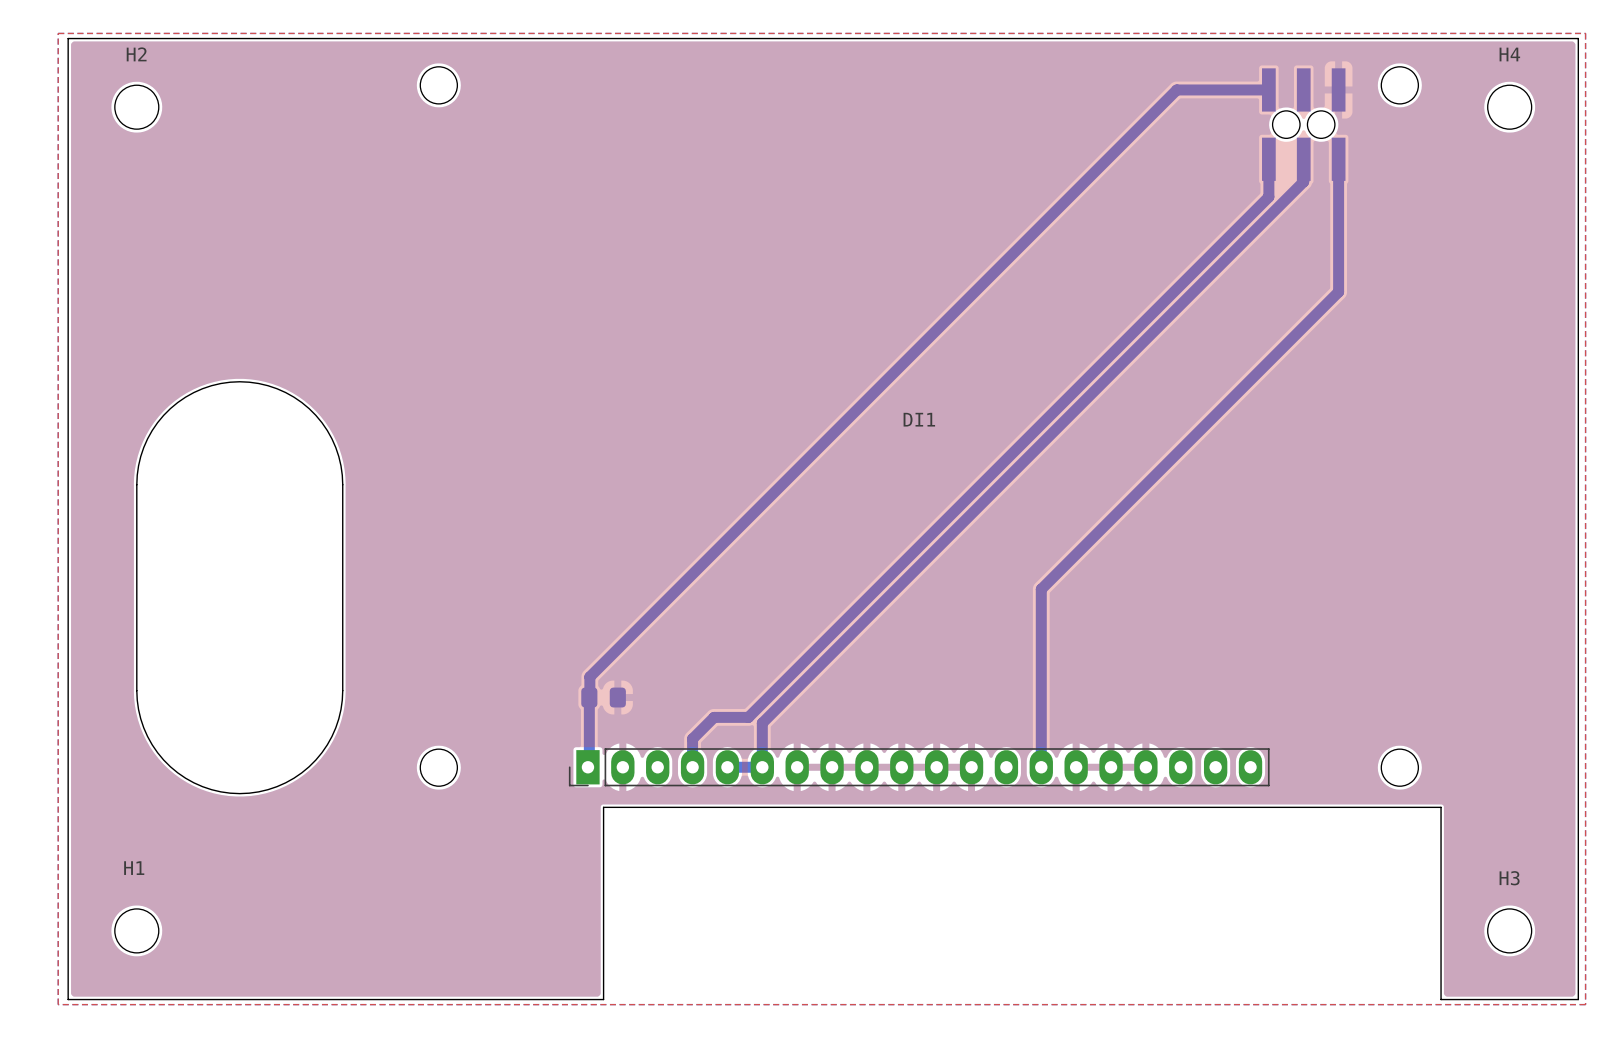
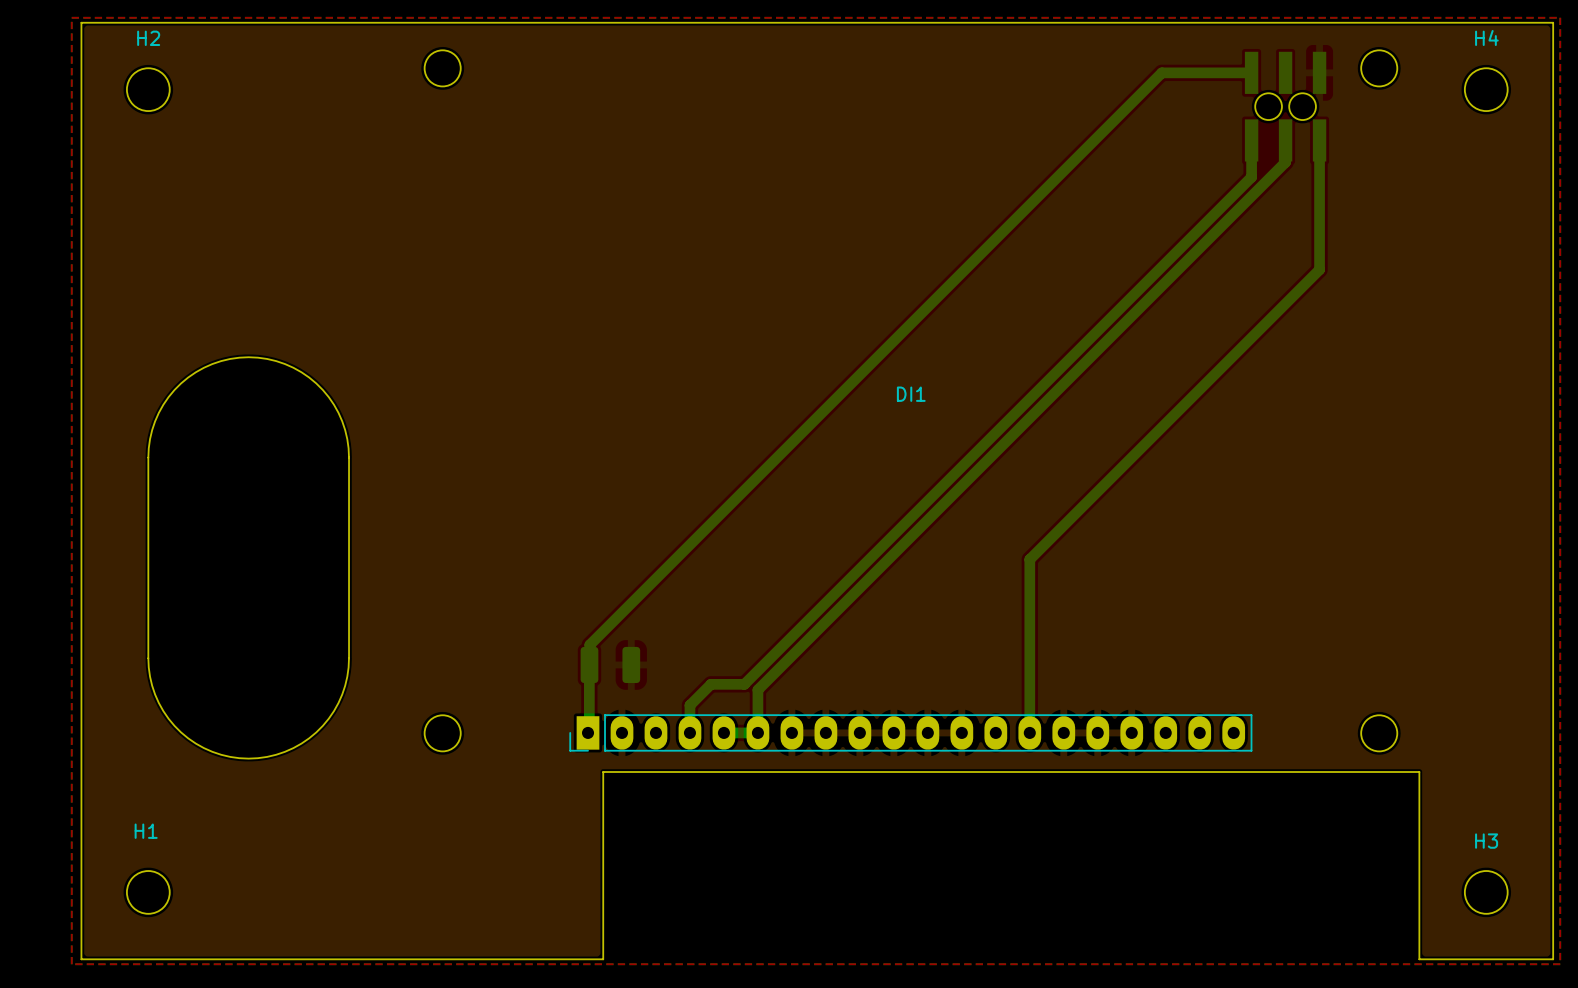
part footprint: [581, 687, 626, 708] -> [580, 646, 641, 684]

